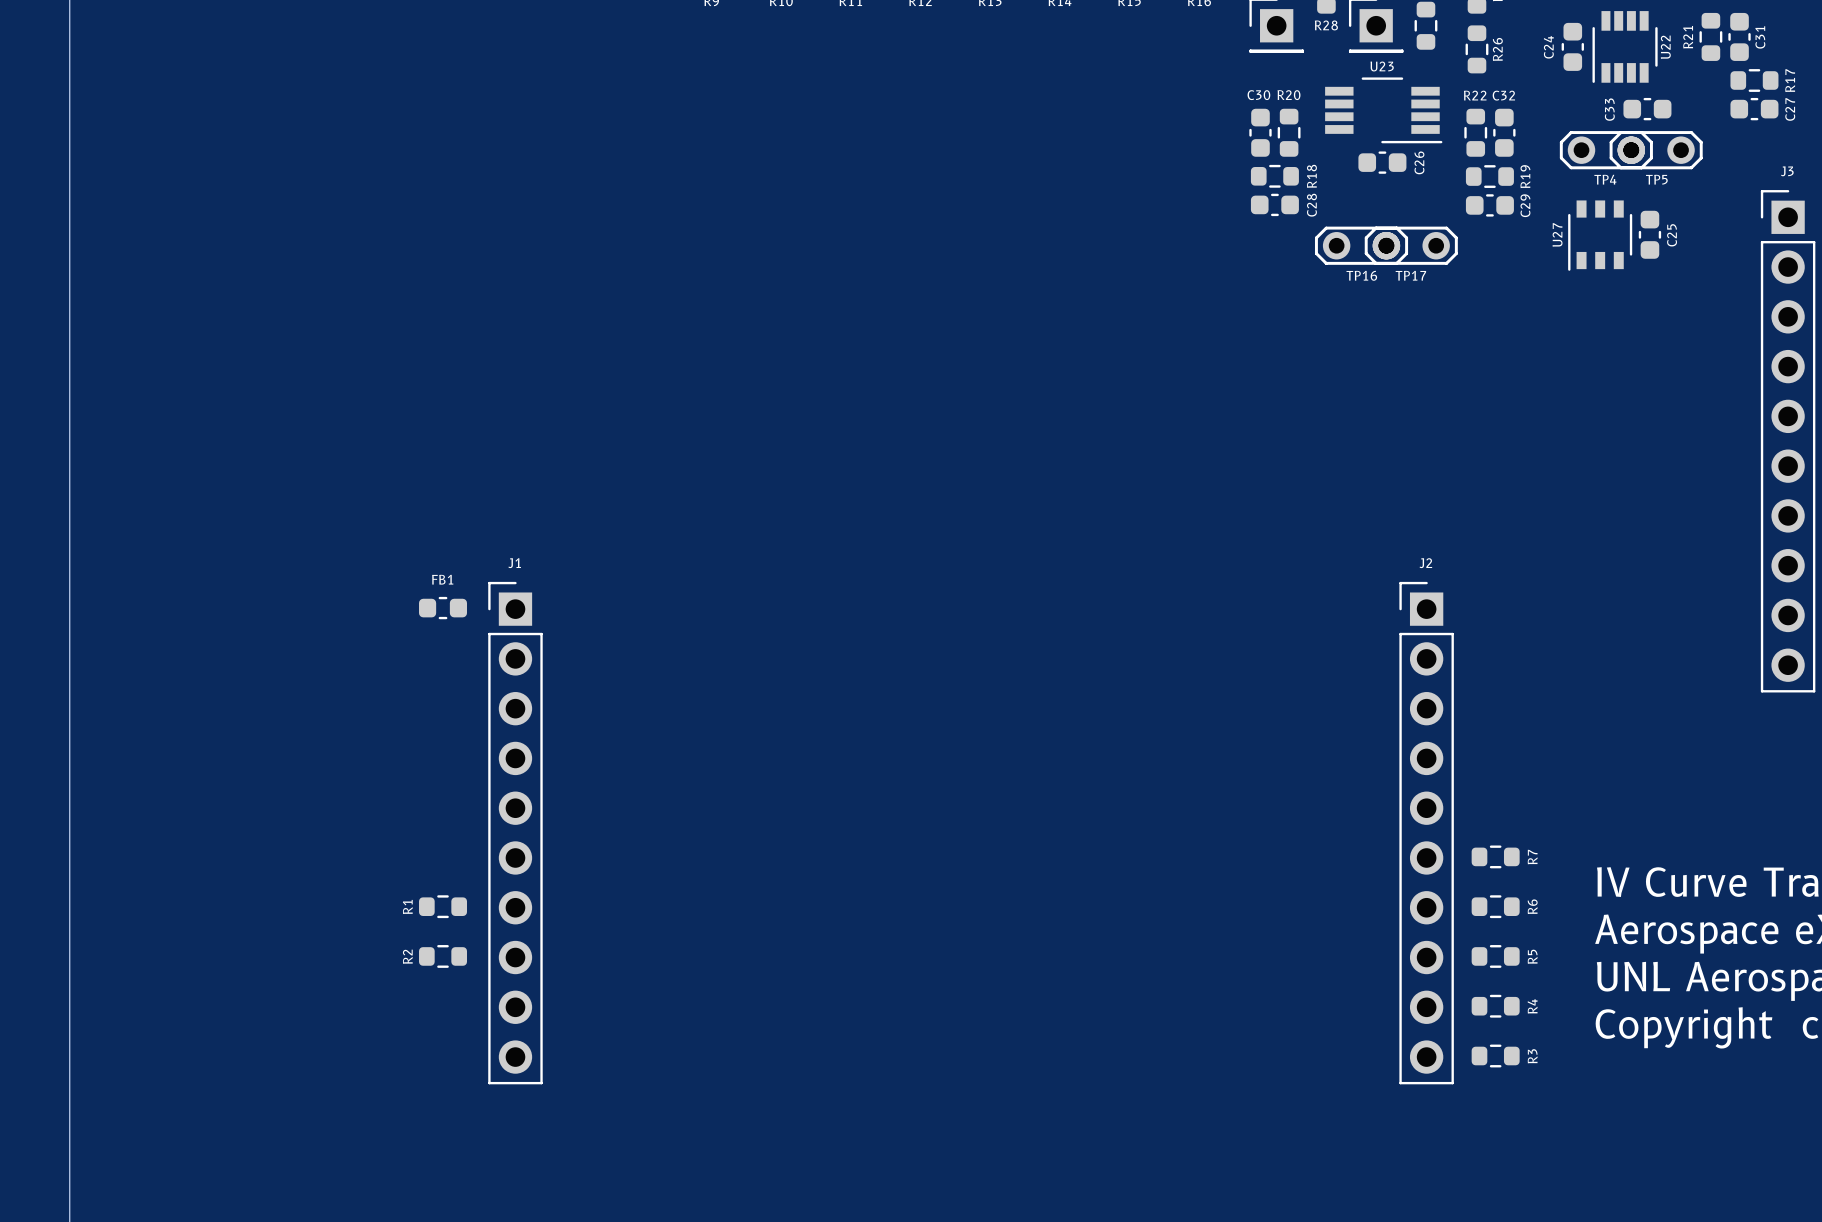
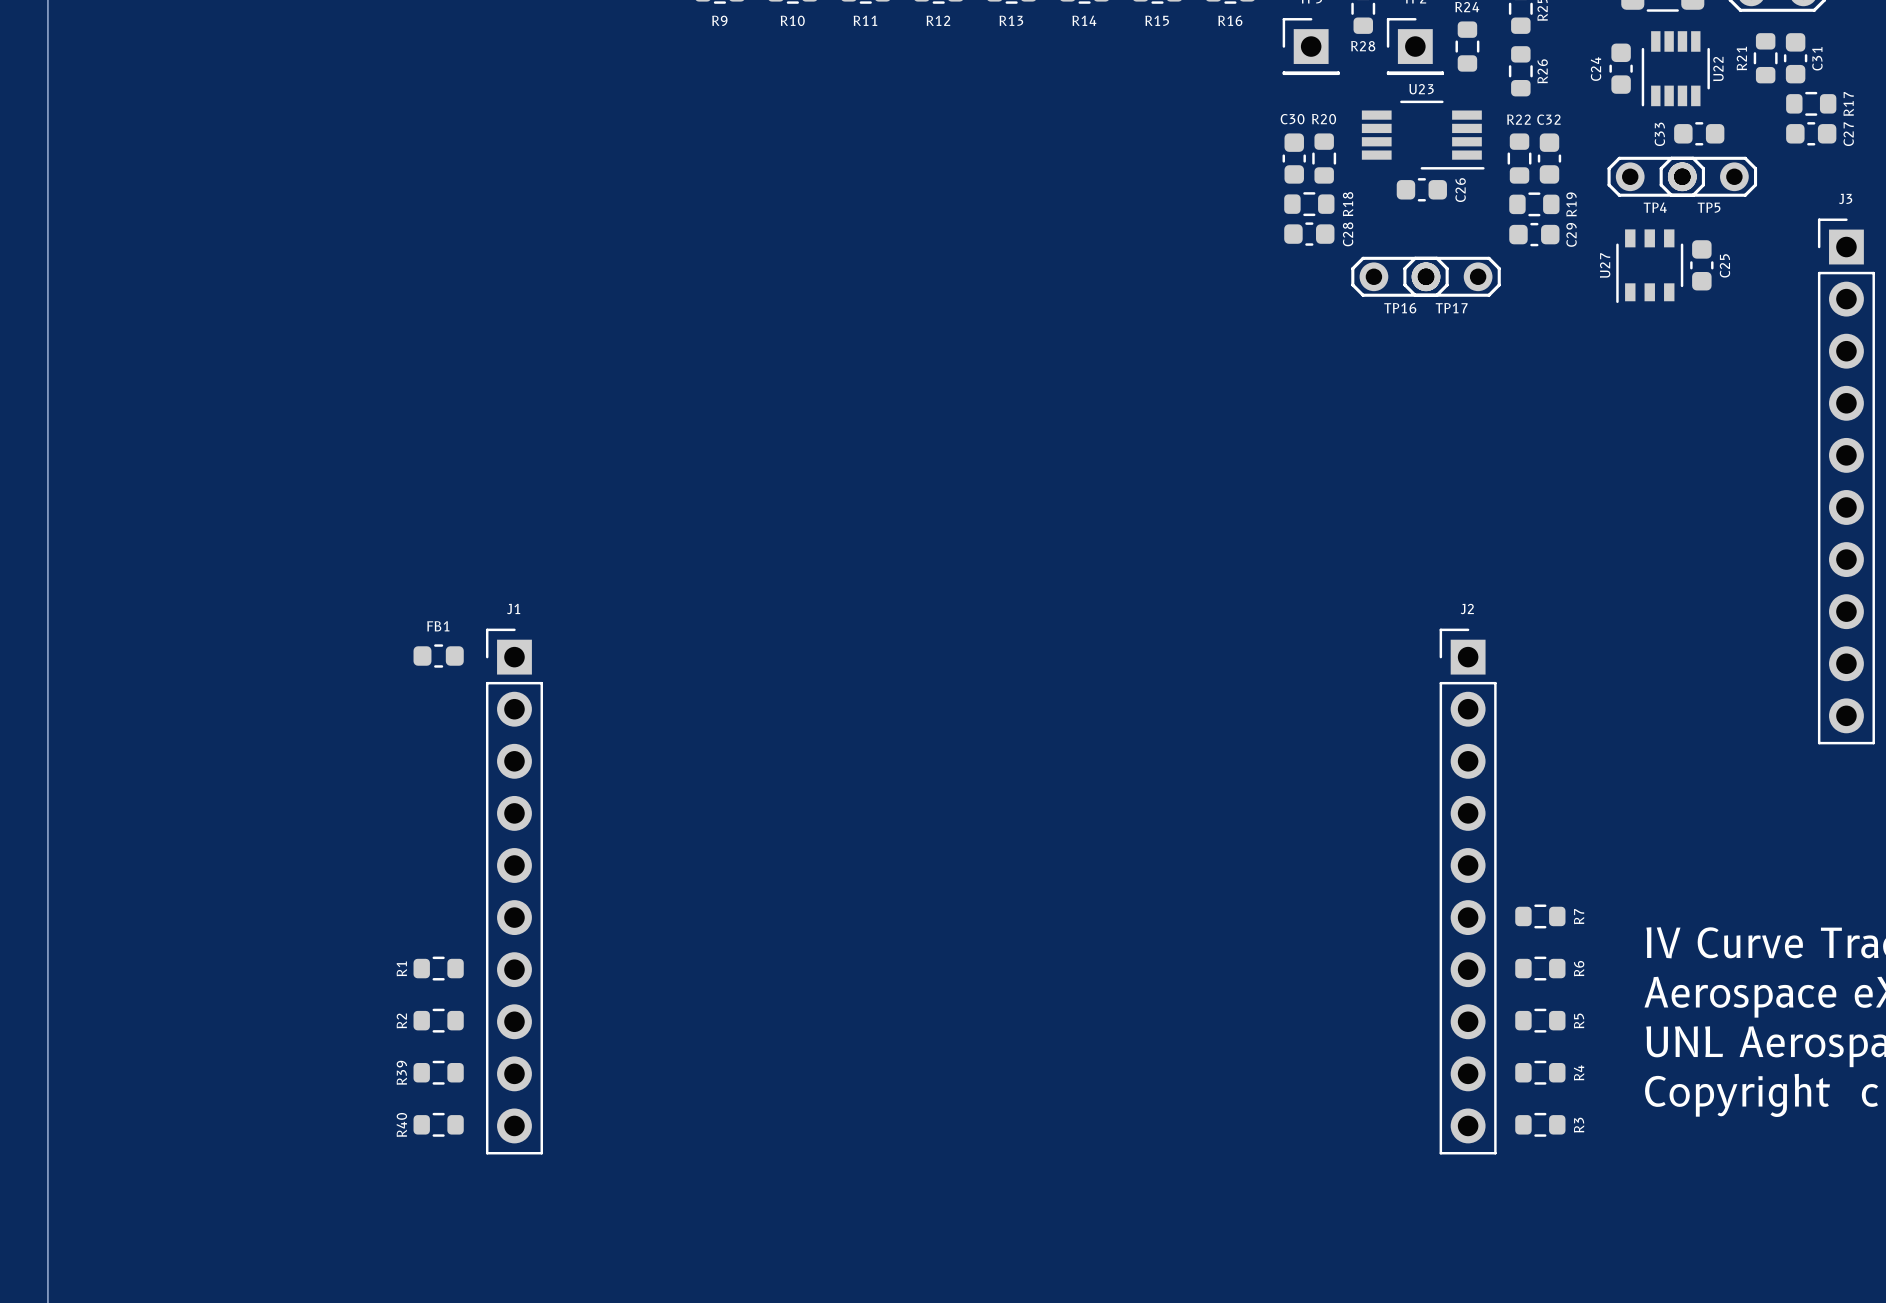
R39: none -> (438, 1072)
R40: none -> (438, 1124)

